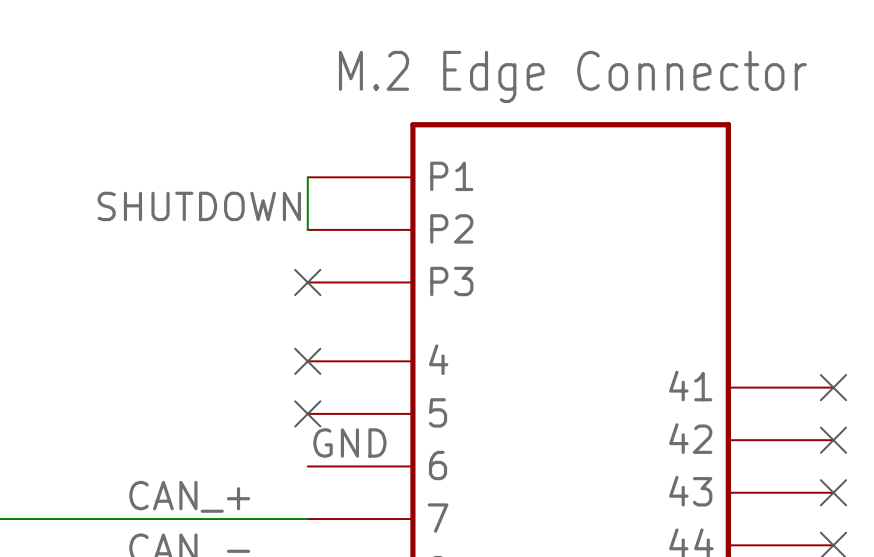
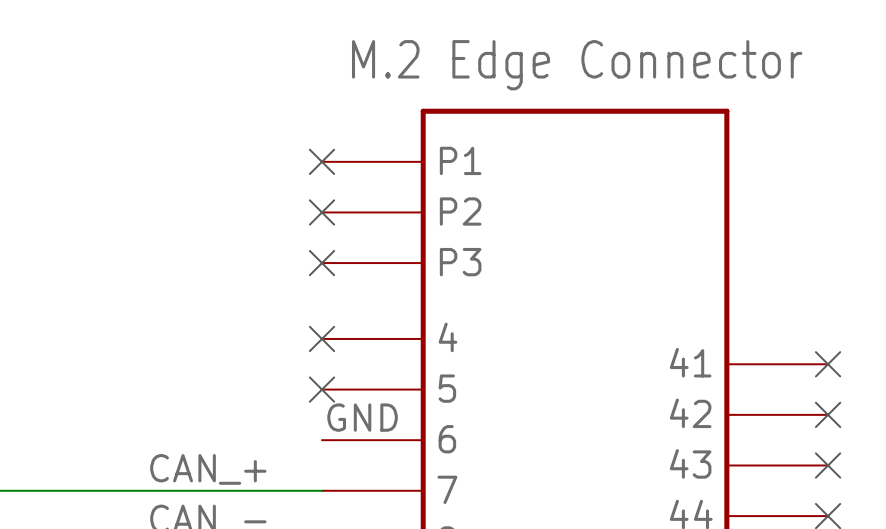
wire: (307, 177) (307, 229) -> none
no-connect mark: none -> (322, 161)
label: SHUTDOWN (199, 206) -> none
no-connect mark: none -> (322, 212)

